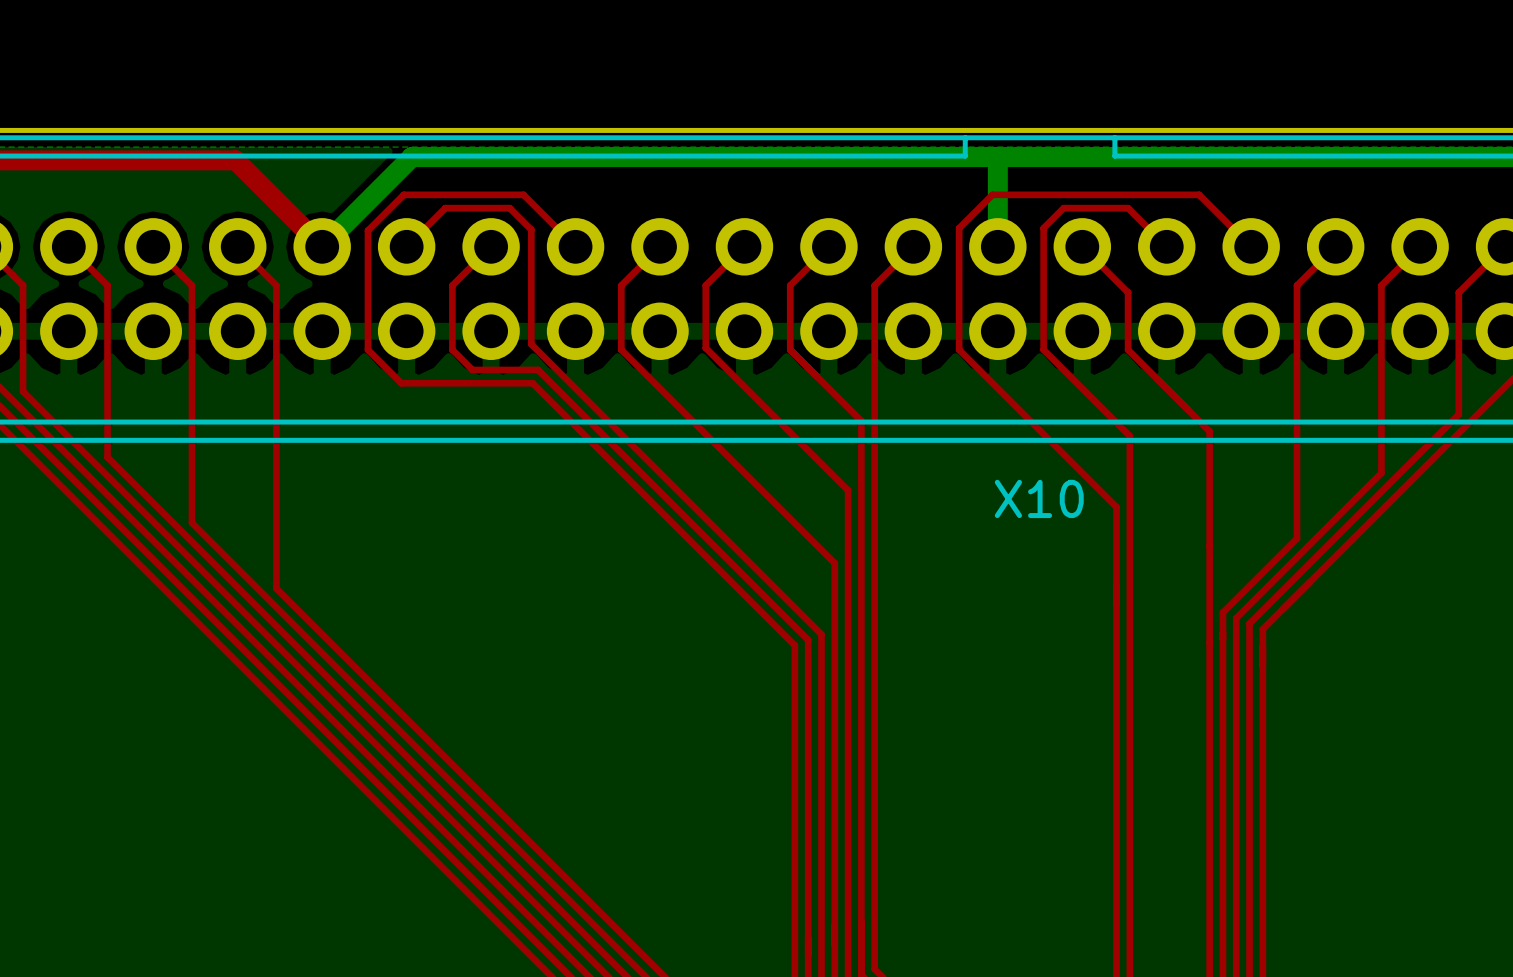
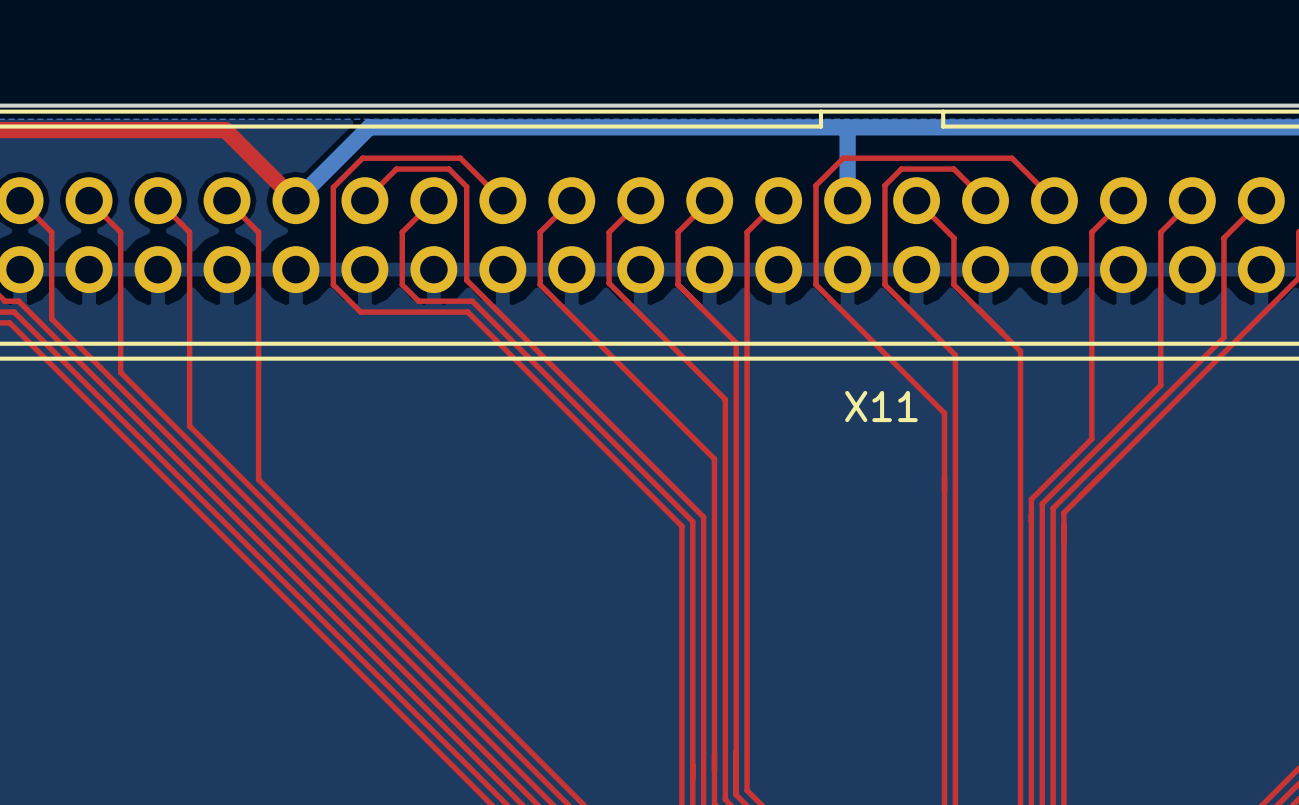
X10 name: X10 (1039, 498) -> X11 (881, 406)

